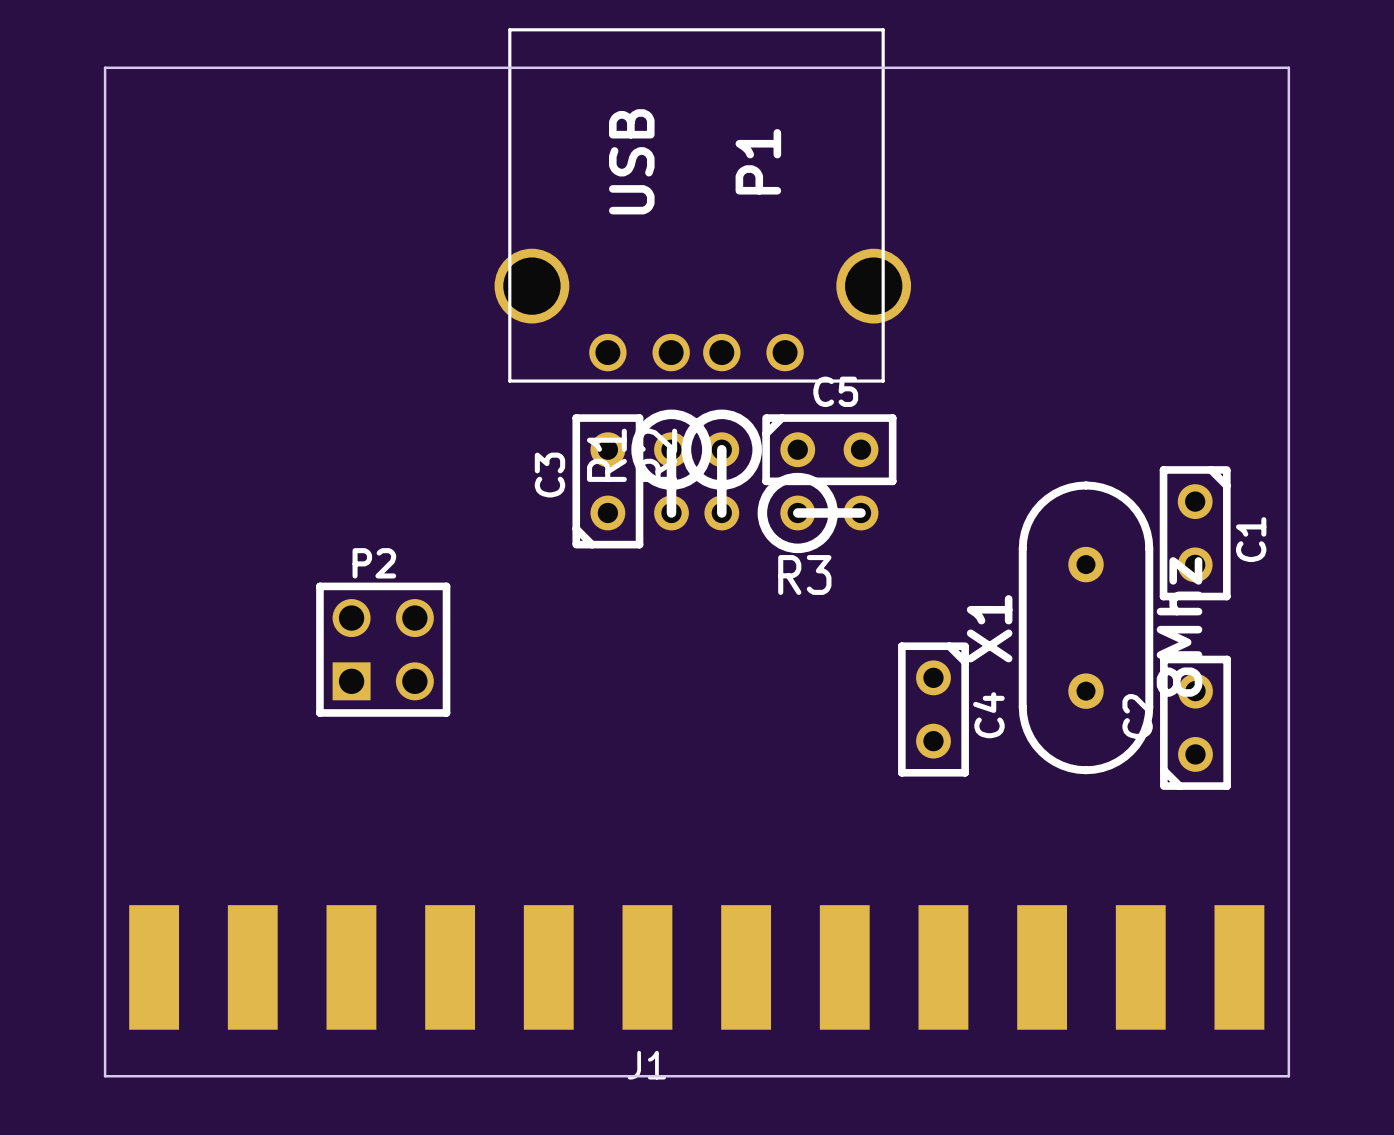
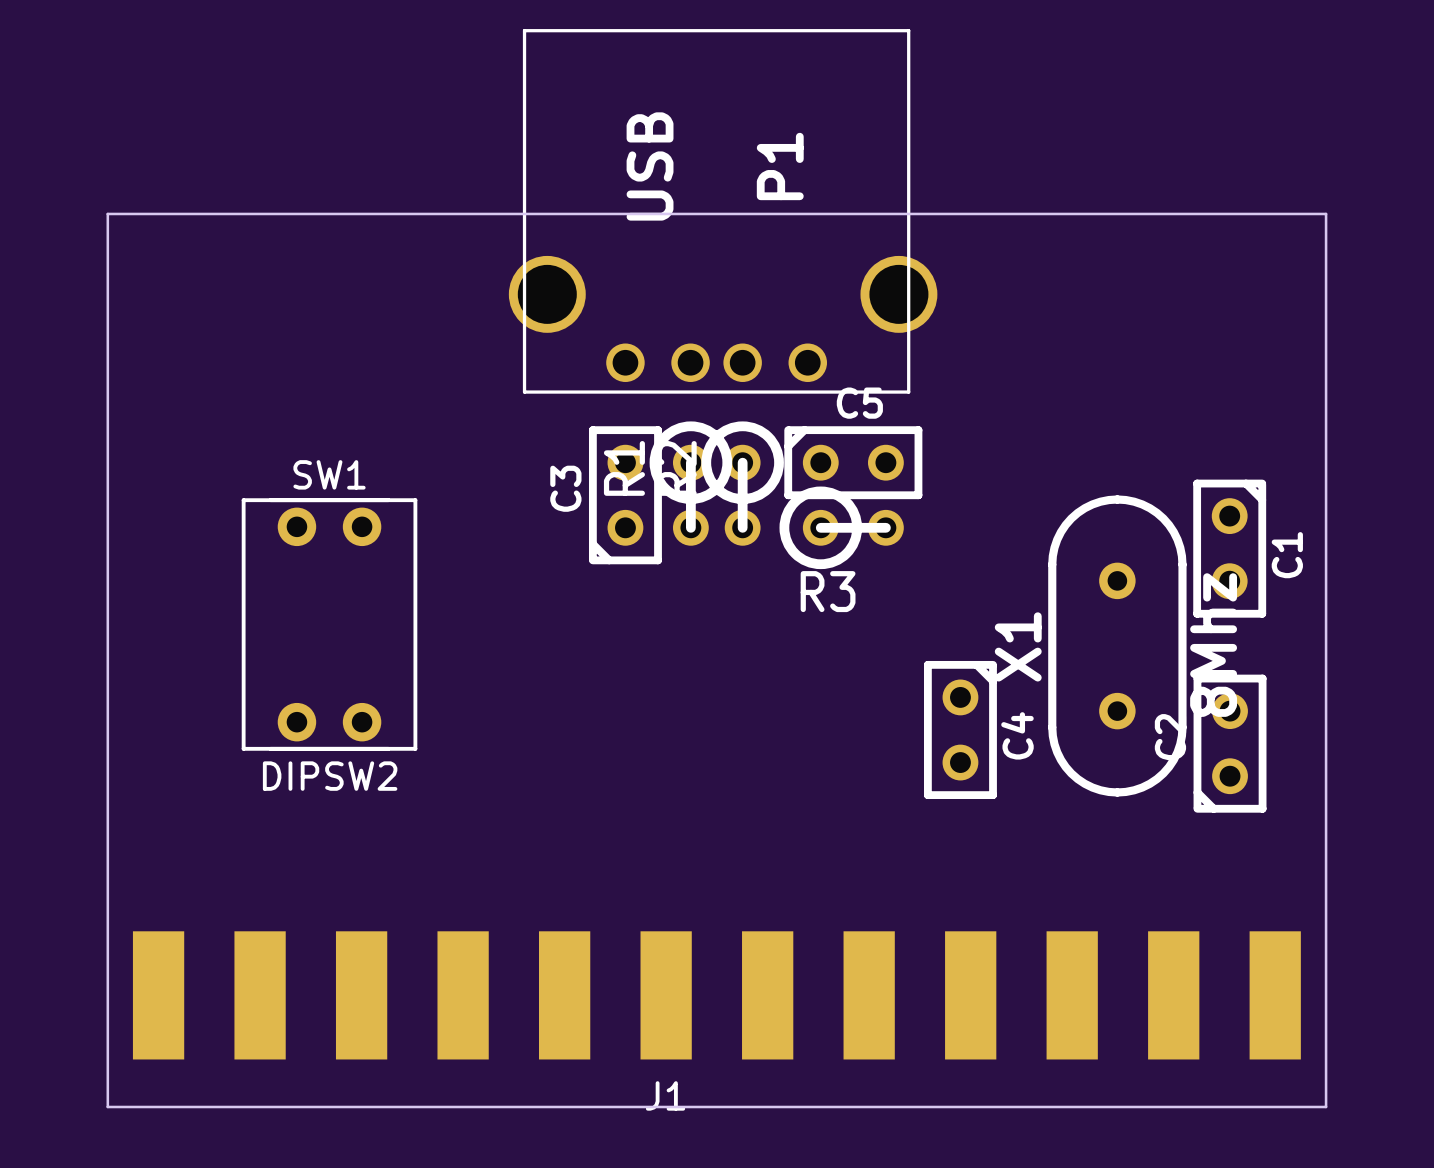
board edge: (1288, 207) (1288, 67) (105, 67) (105, 1076) (1288, 1076) -> (1326, 213) (107, 213) (107, 1106) (1326, 1106)
SW1: none -> DIPSW2 (329, 624)
P2: (383, 649) -> none

